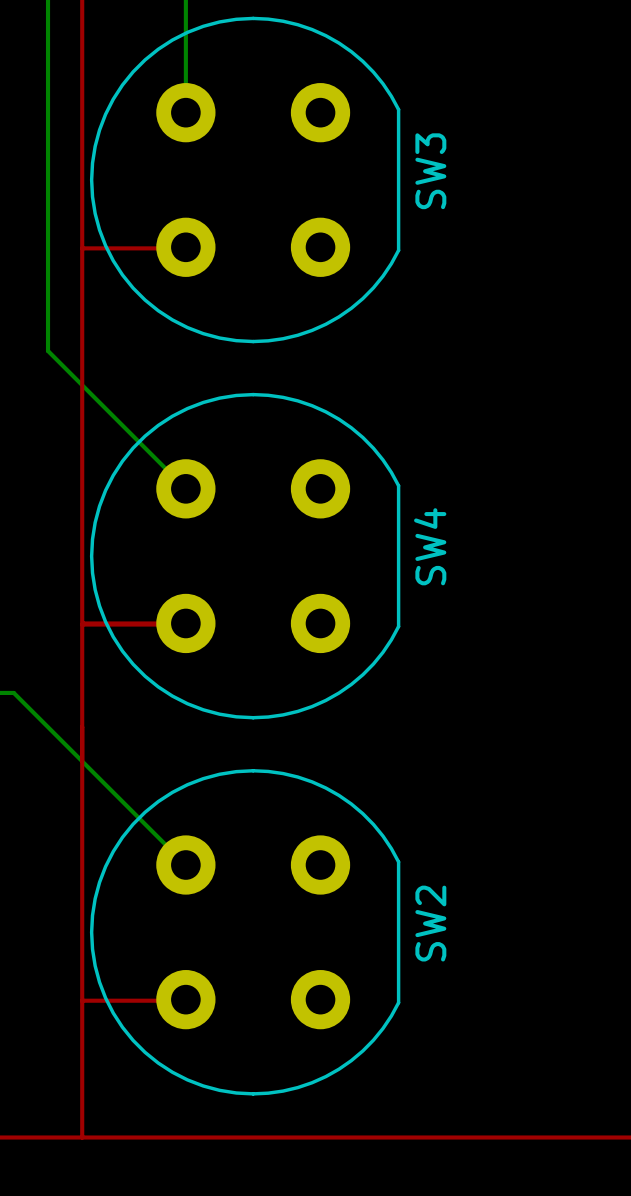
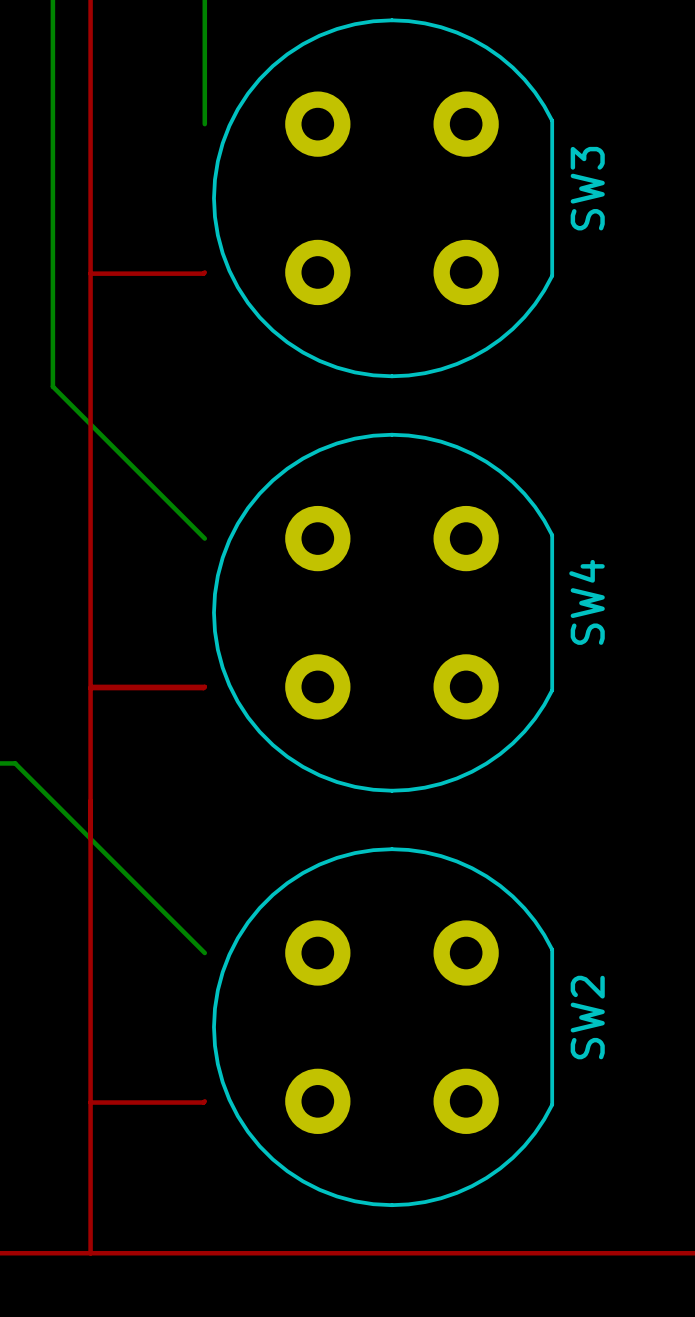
SW3 position: (245, 179) -> (383, 198)
SW4 position: (245, 556) -> (383, 612)
SW2 position: (245, 932) -> (383, 1027)

